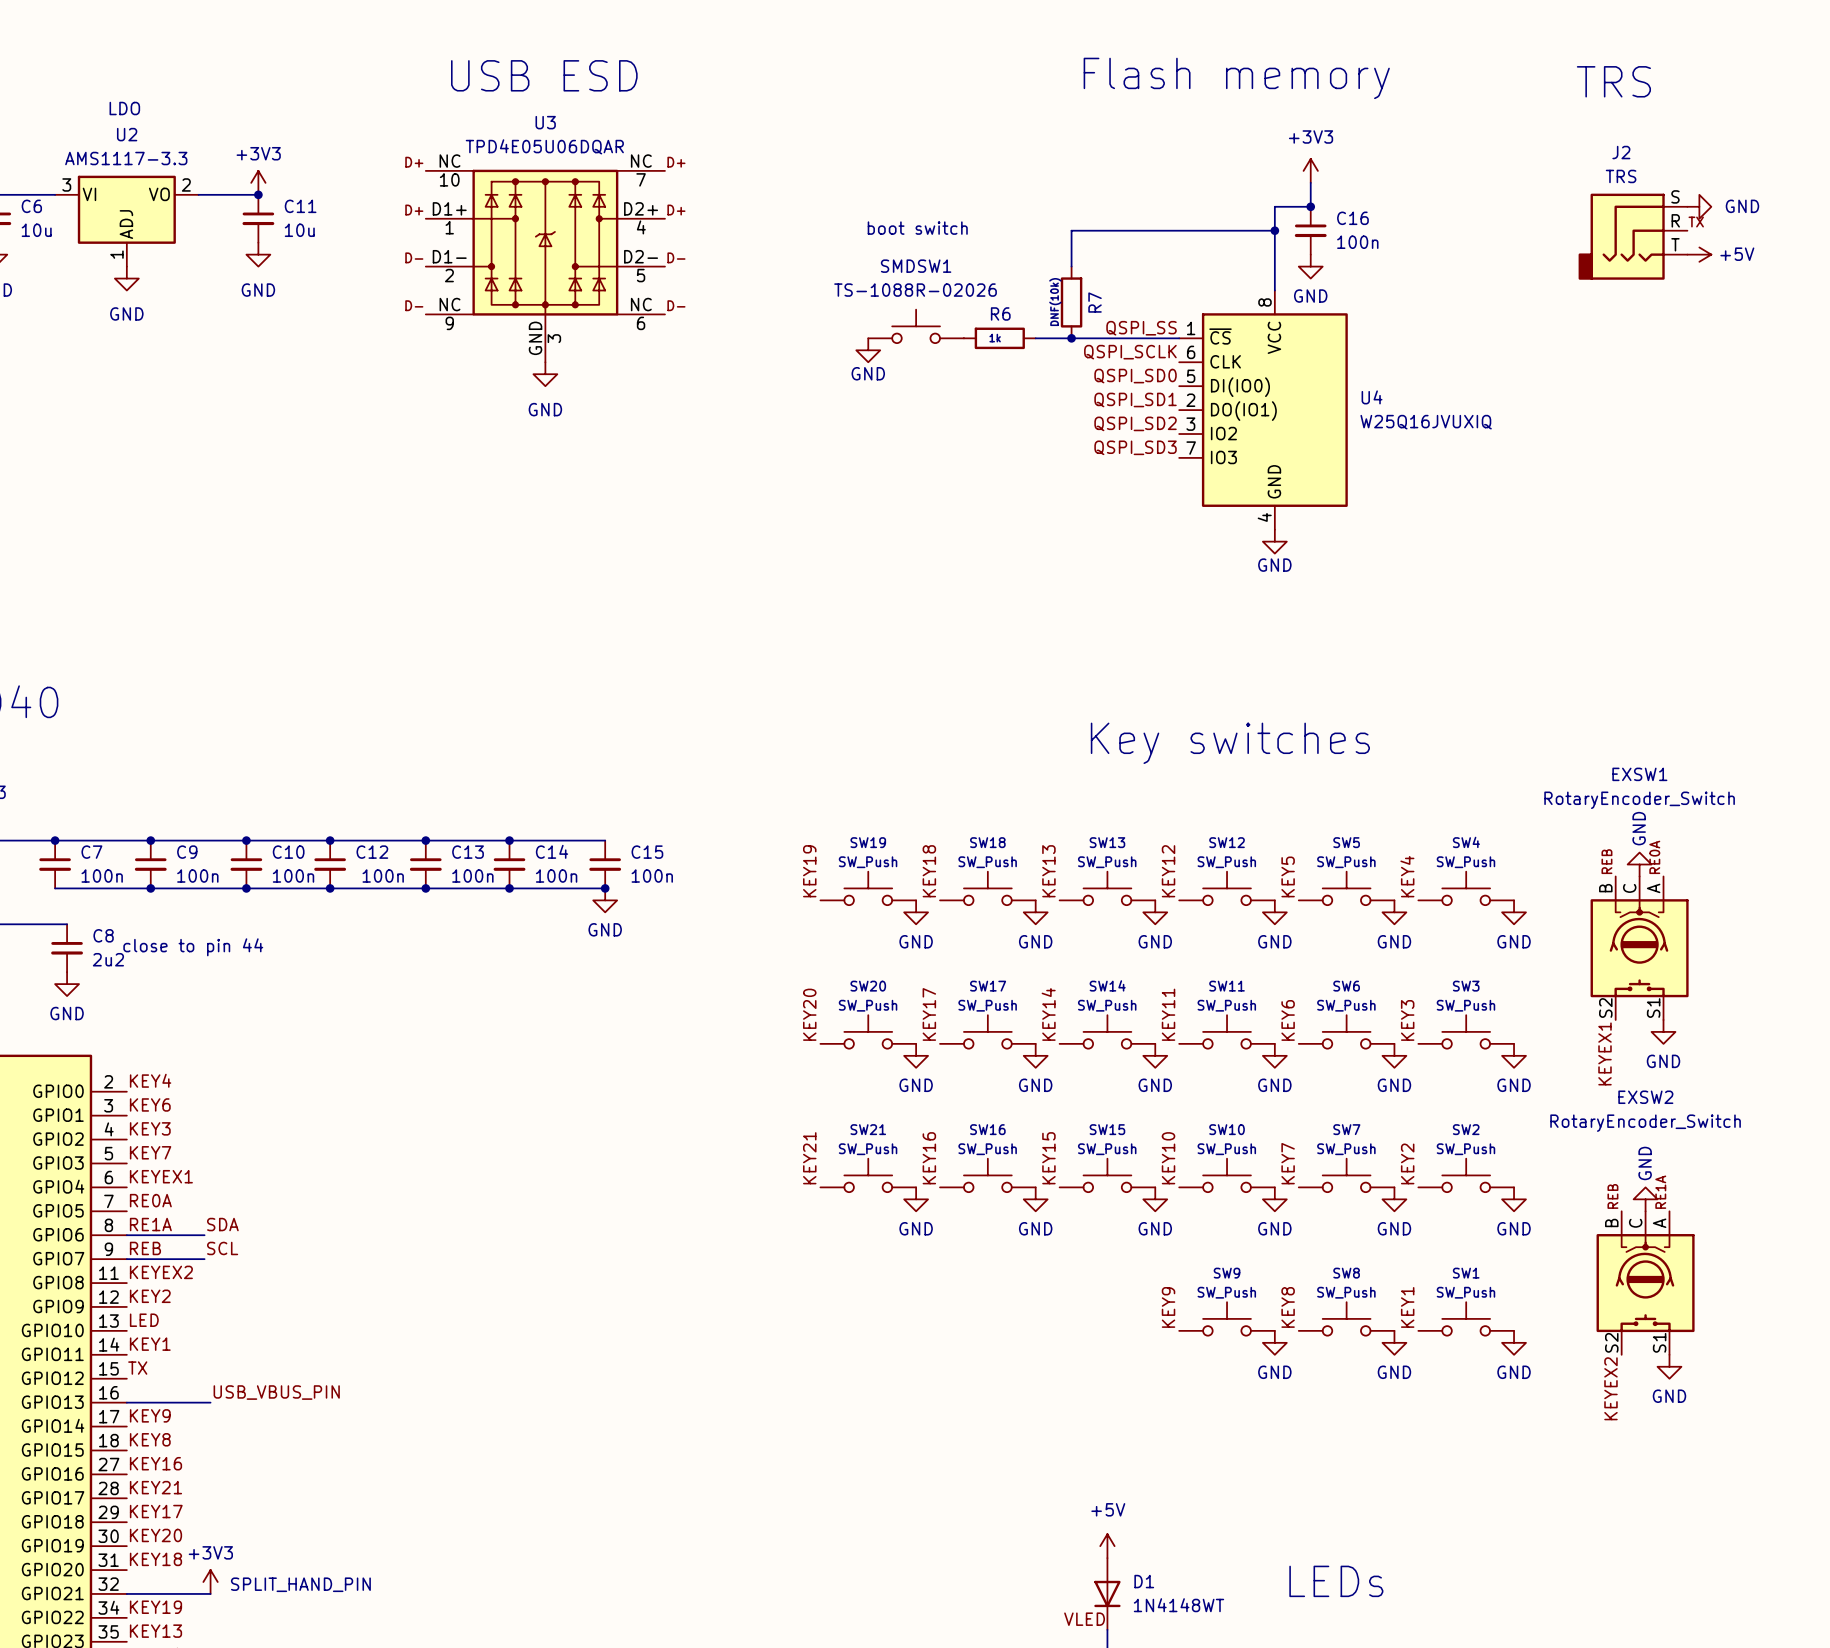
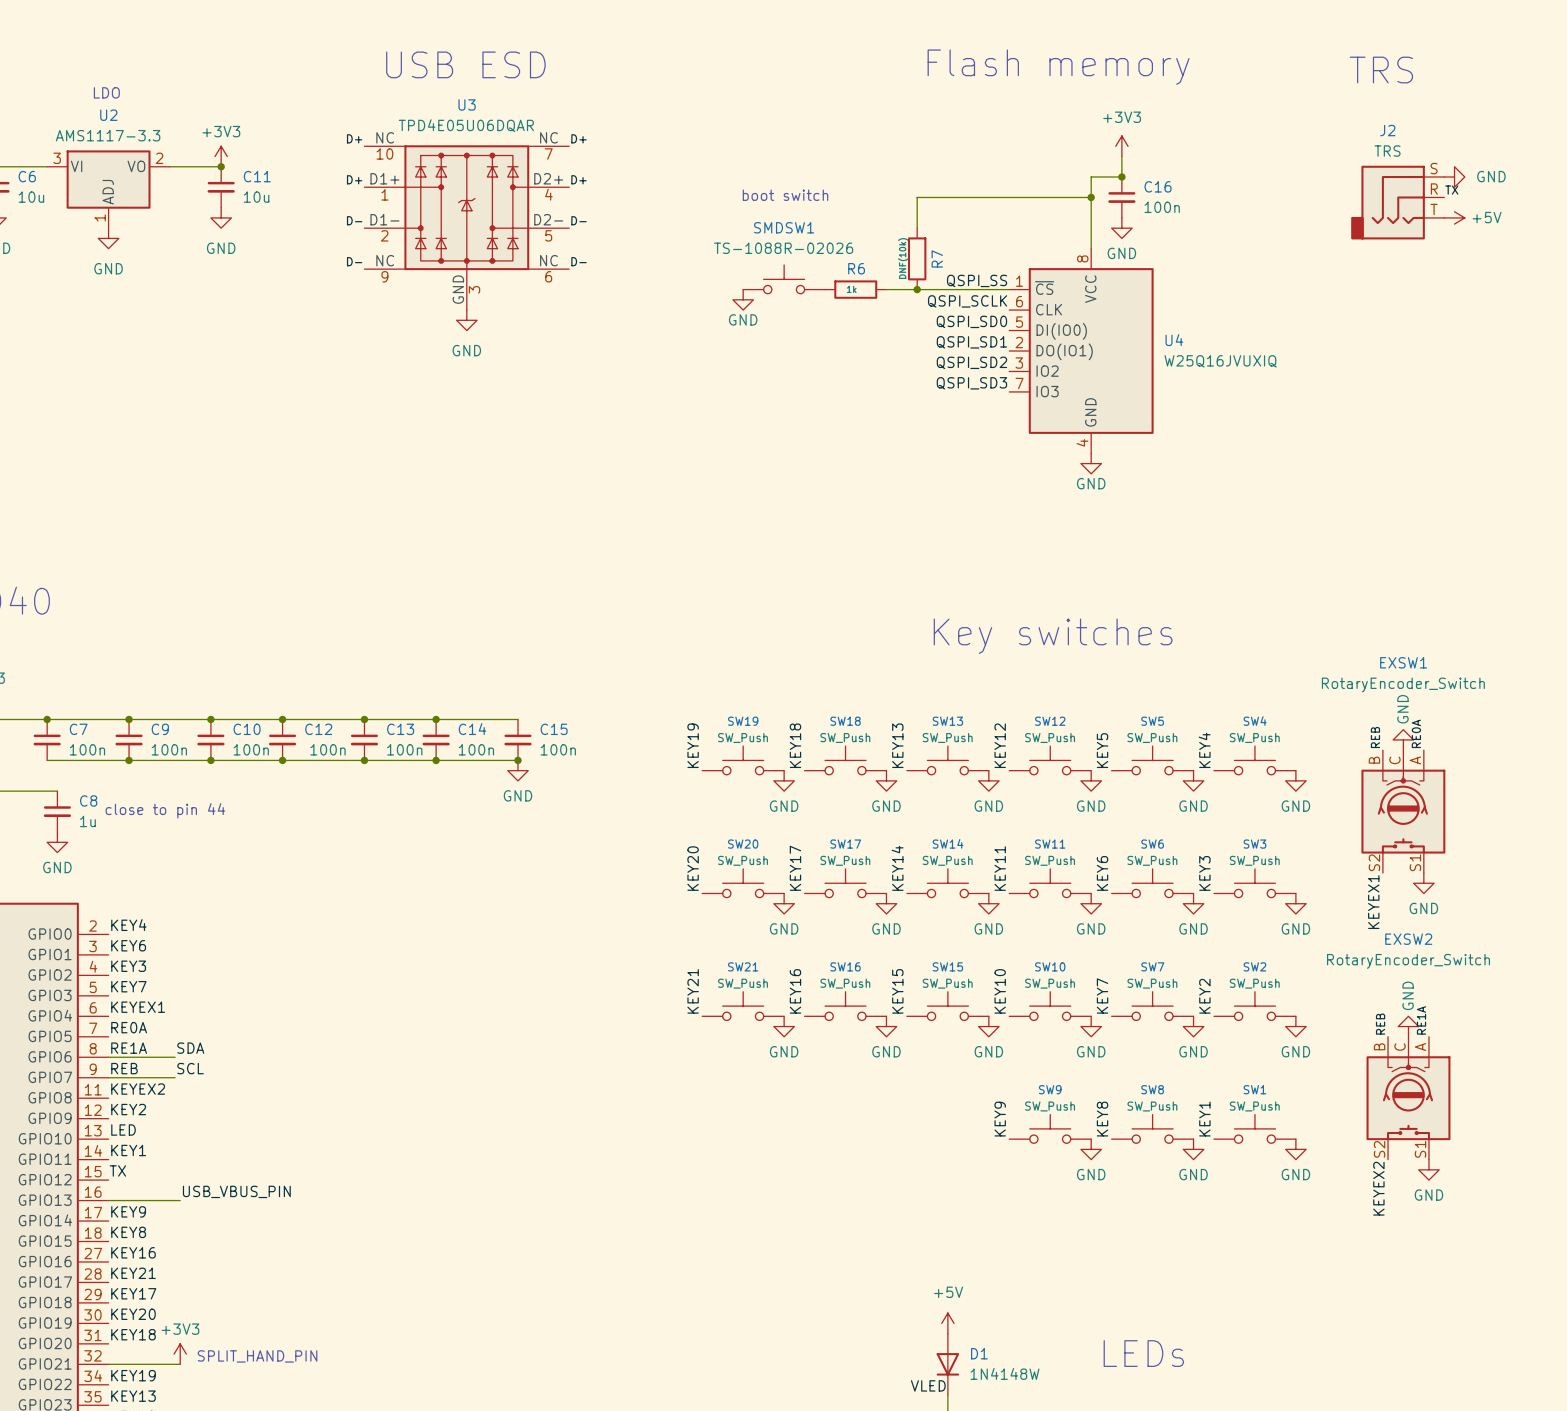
C8 value: 2u2 (108, 959) -> 1u (87, 821)
D1 value: 1N4148WT (1178, 1605) -> 1N4148W (1004, 1373)

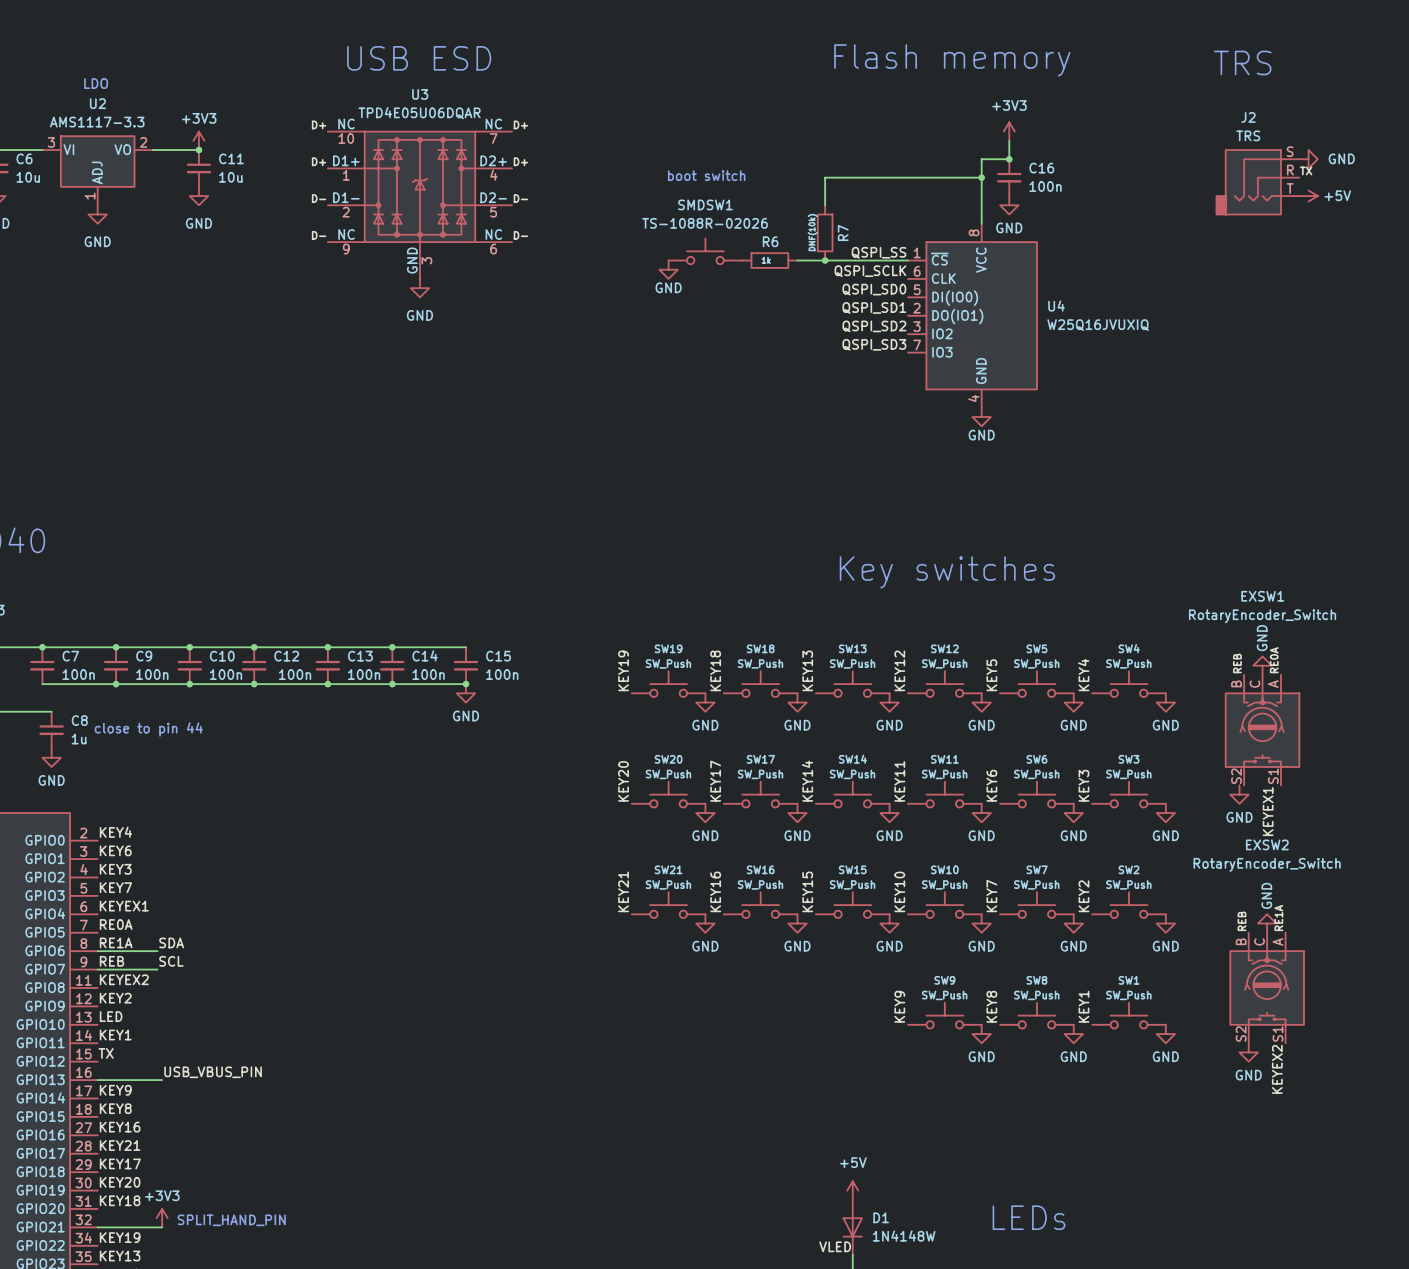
power symbol position: GND (1423, 883) -> GND (1239, 794)
label position: KEYEX1 (1373, 902) -> KEYEX1 (1268, 811)
power symbol position: GND (1428, 1169) -> GND (1248, 1052)
label position: KEYEX2 (1378, 1188) -> KEYEX2 (1277, 1069)

